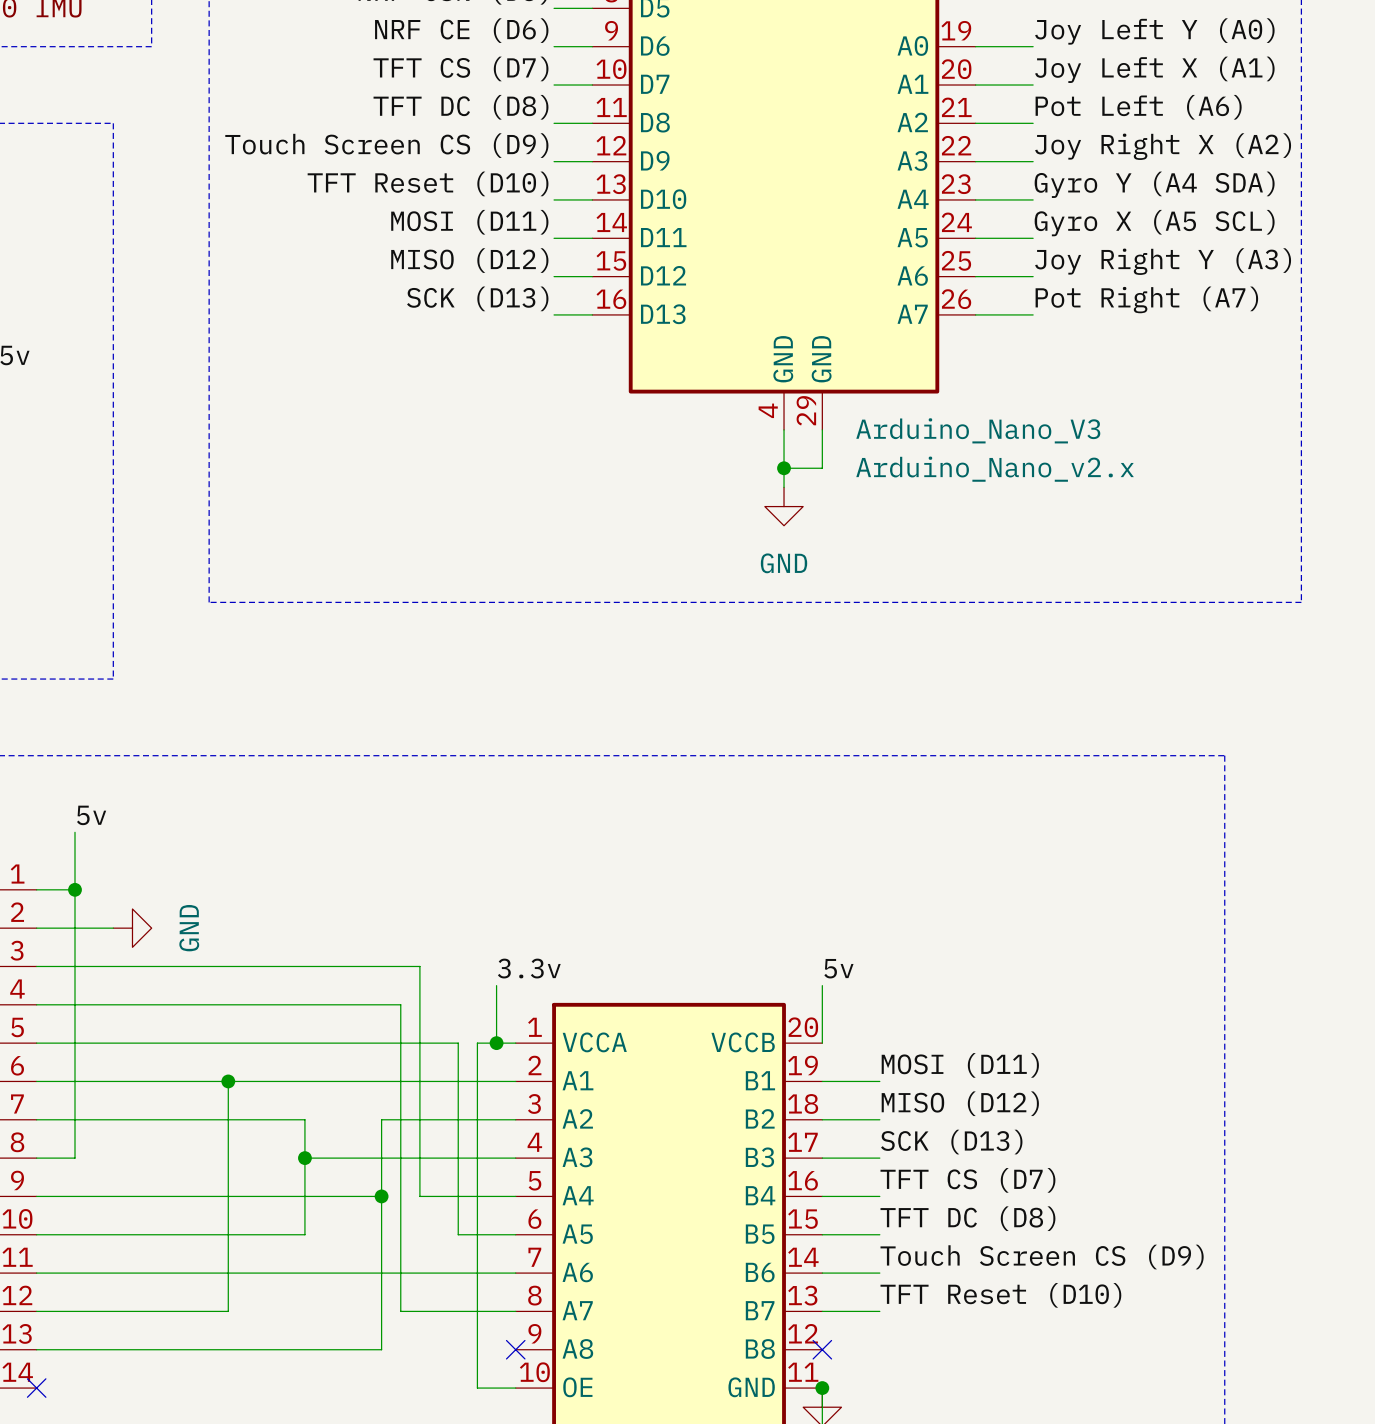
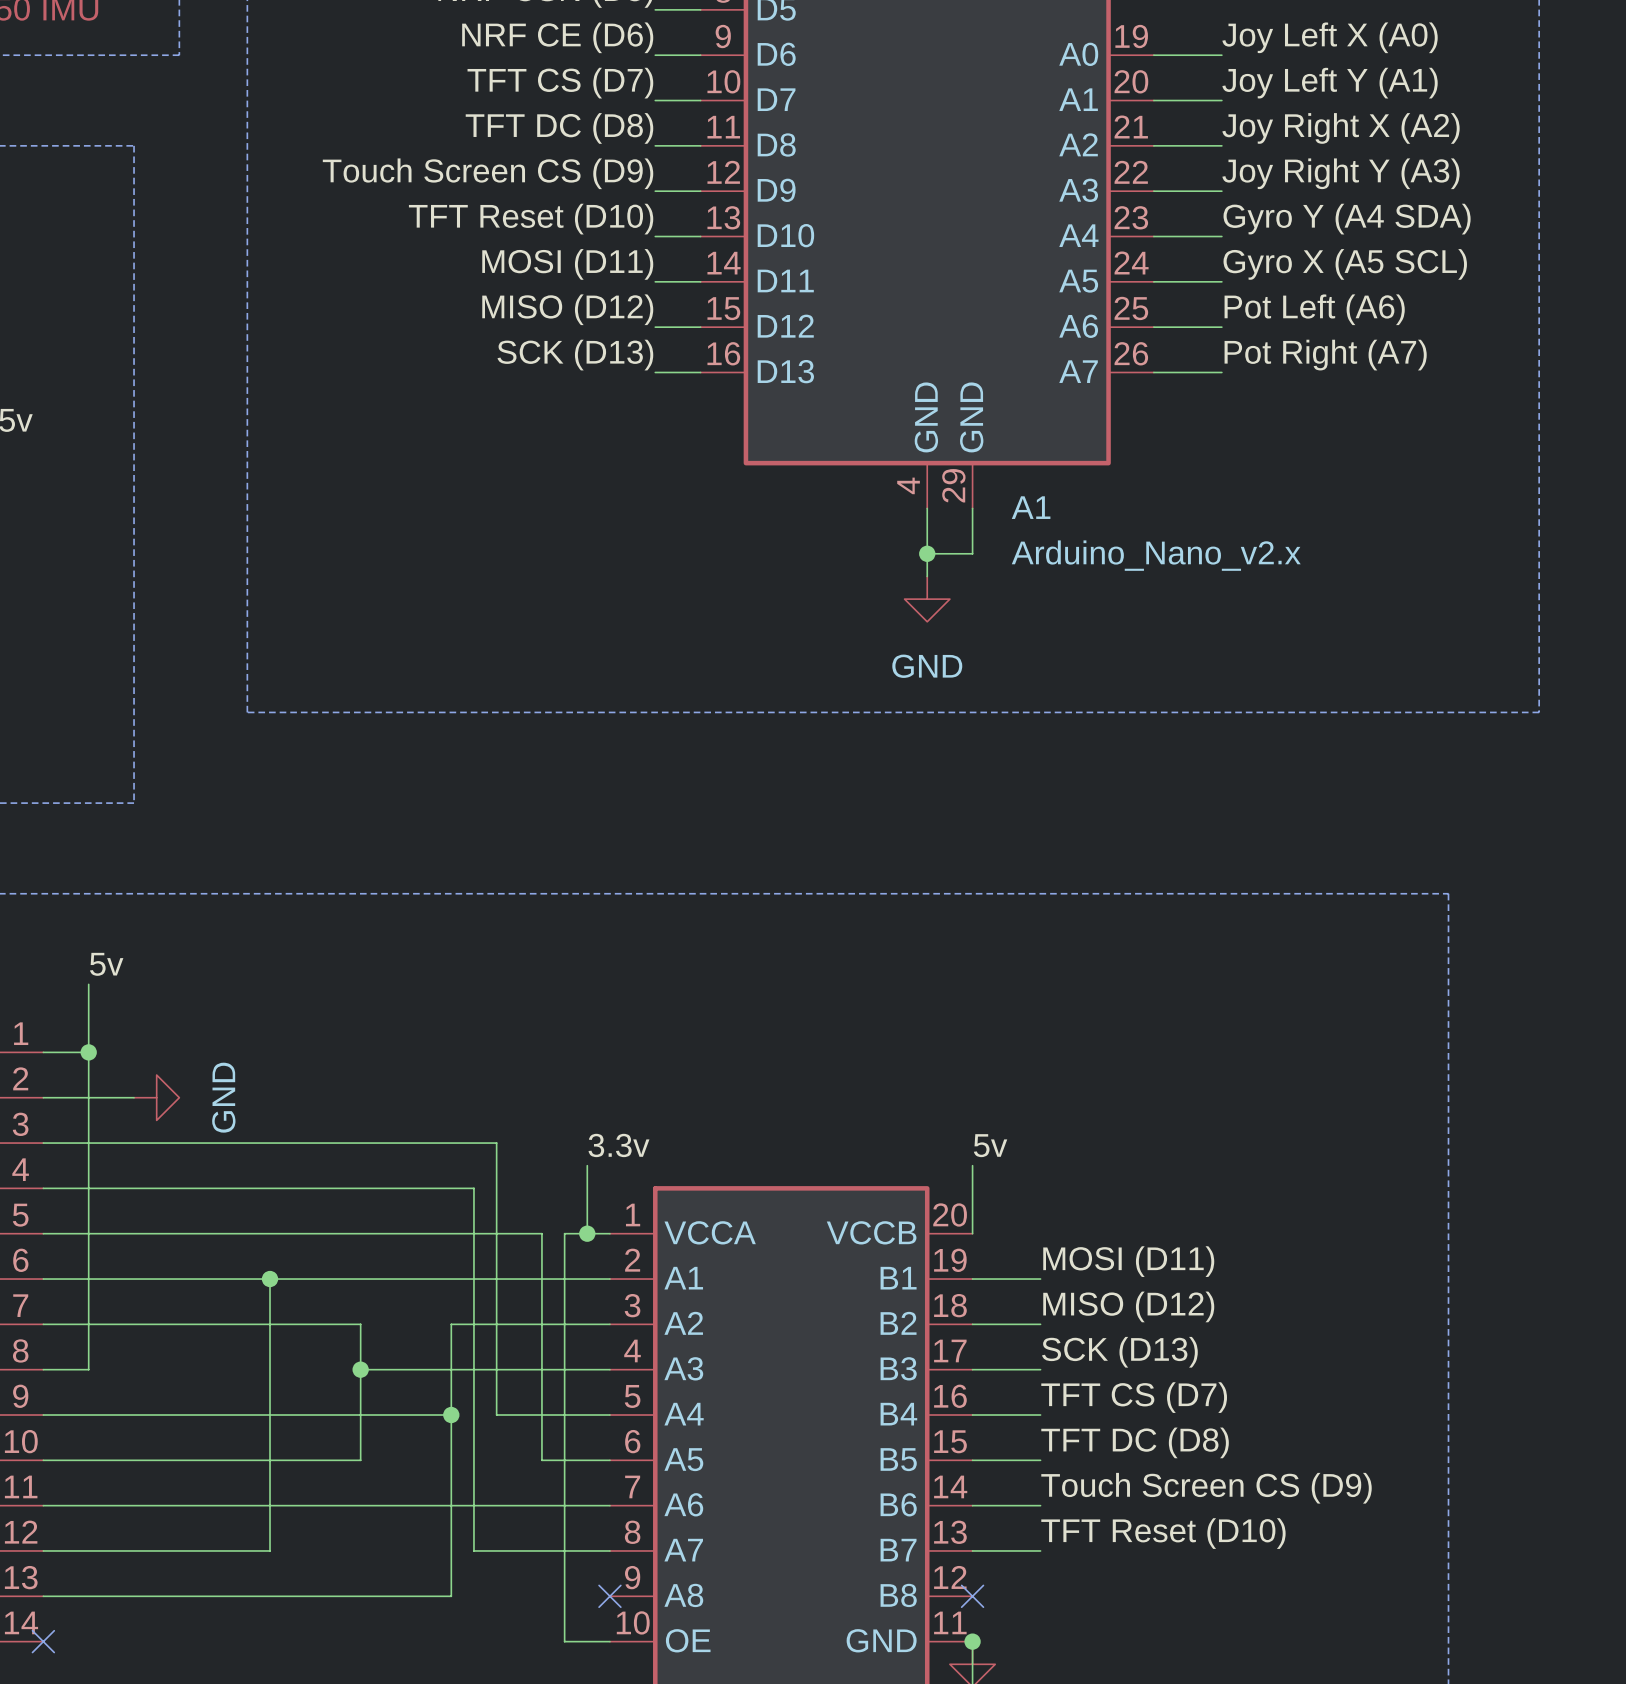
label: Joy Left Y (A0) (1154, 31) -> Joy Left X (A0) (1330, 37)
label: Joy Left X (A1) (1154, 69) -> Joy Left Y (A1) (1330, 83)
label: Pot Left (A6) (1138, 107) -> Joy Right X (A2) (1341, 128)
label: Joy Right X (A2) (1163, 146) -> Joy Right Y (A3) (1341, 173)
label: Joy Right Y (A3) (1163, 261) -> Pot Left (A6) (1314, 309)
Arduino_Nano_V3 name: Arduino_Nano_V3 (978, 430) -> A1 (1031, 507)

